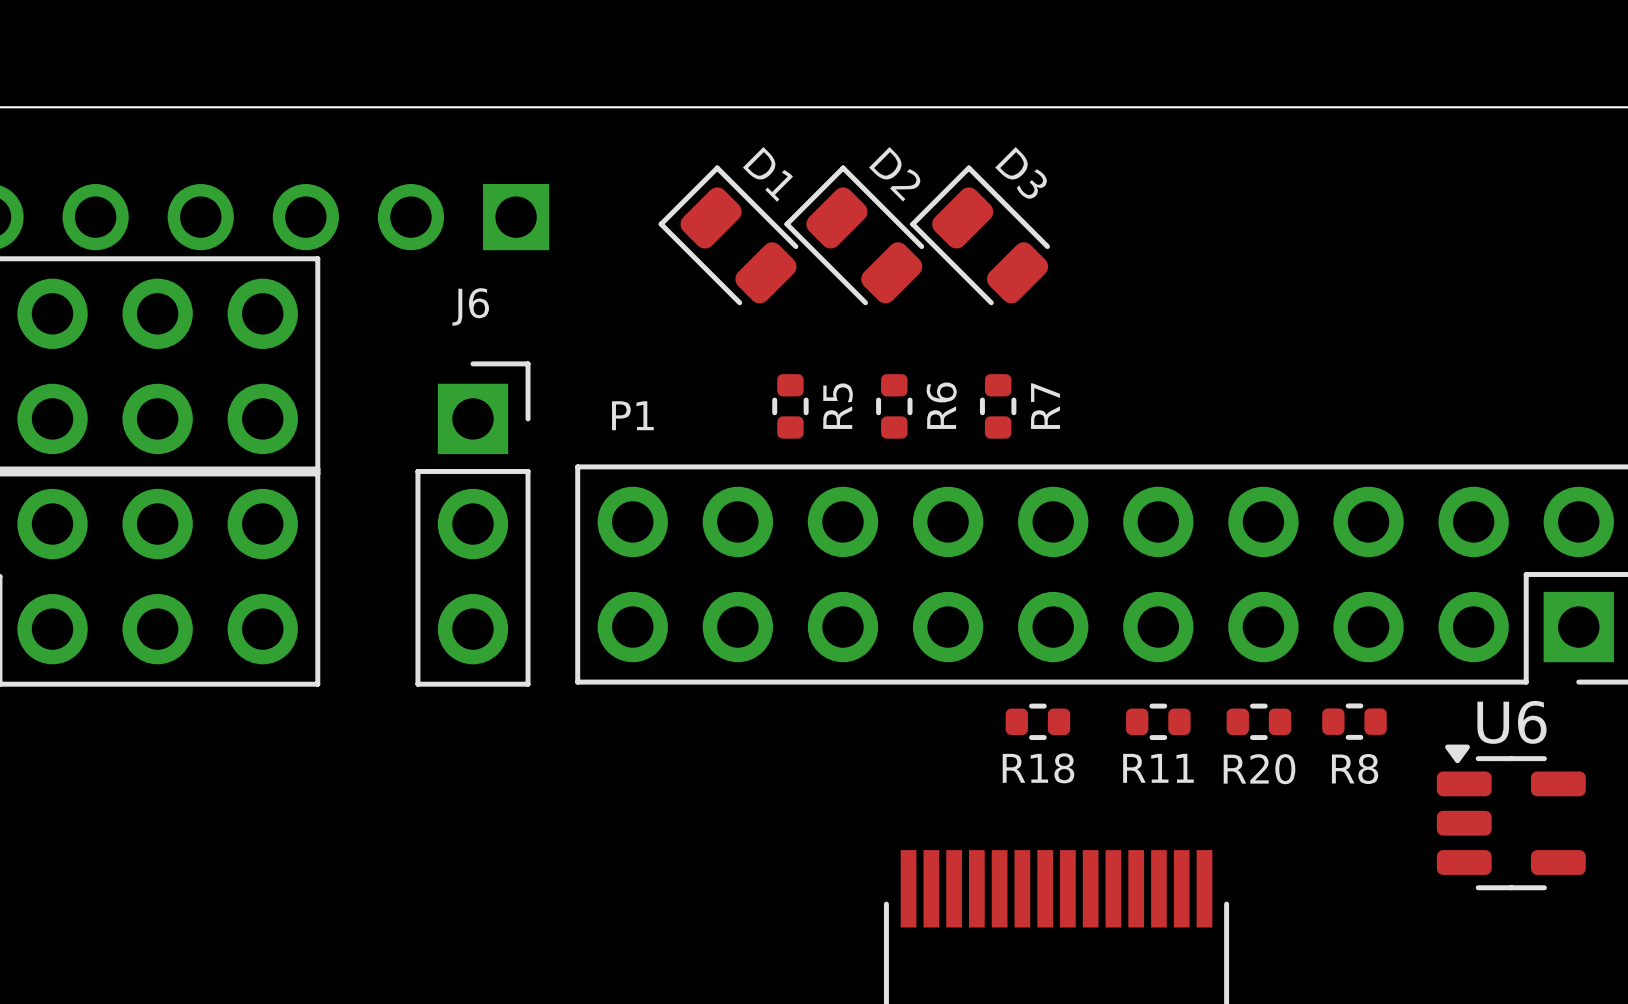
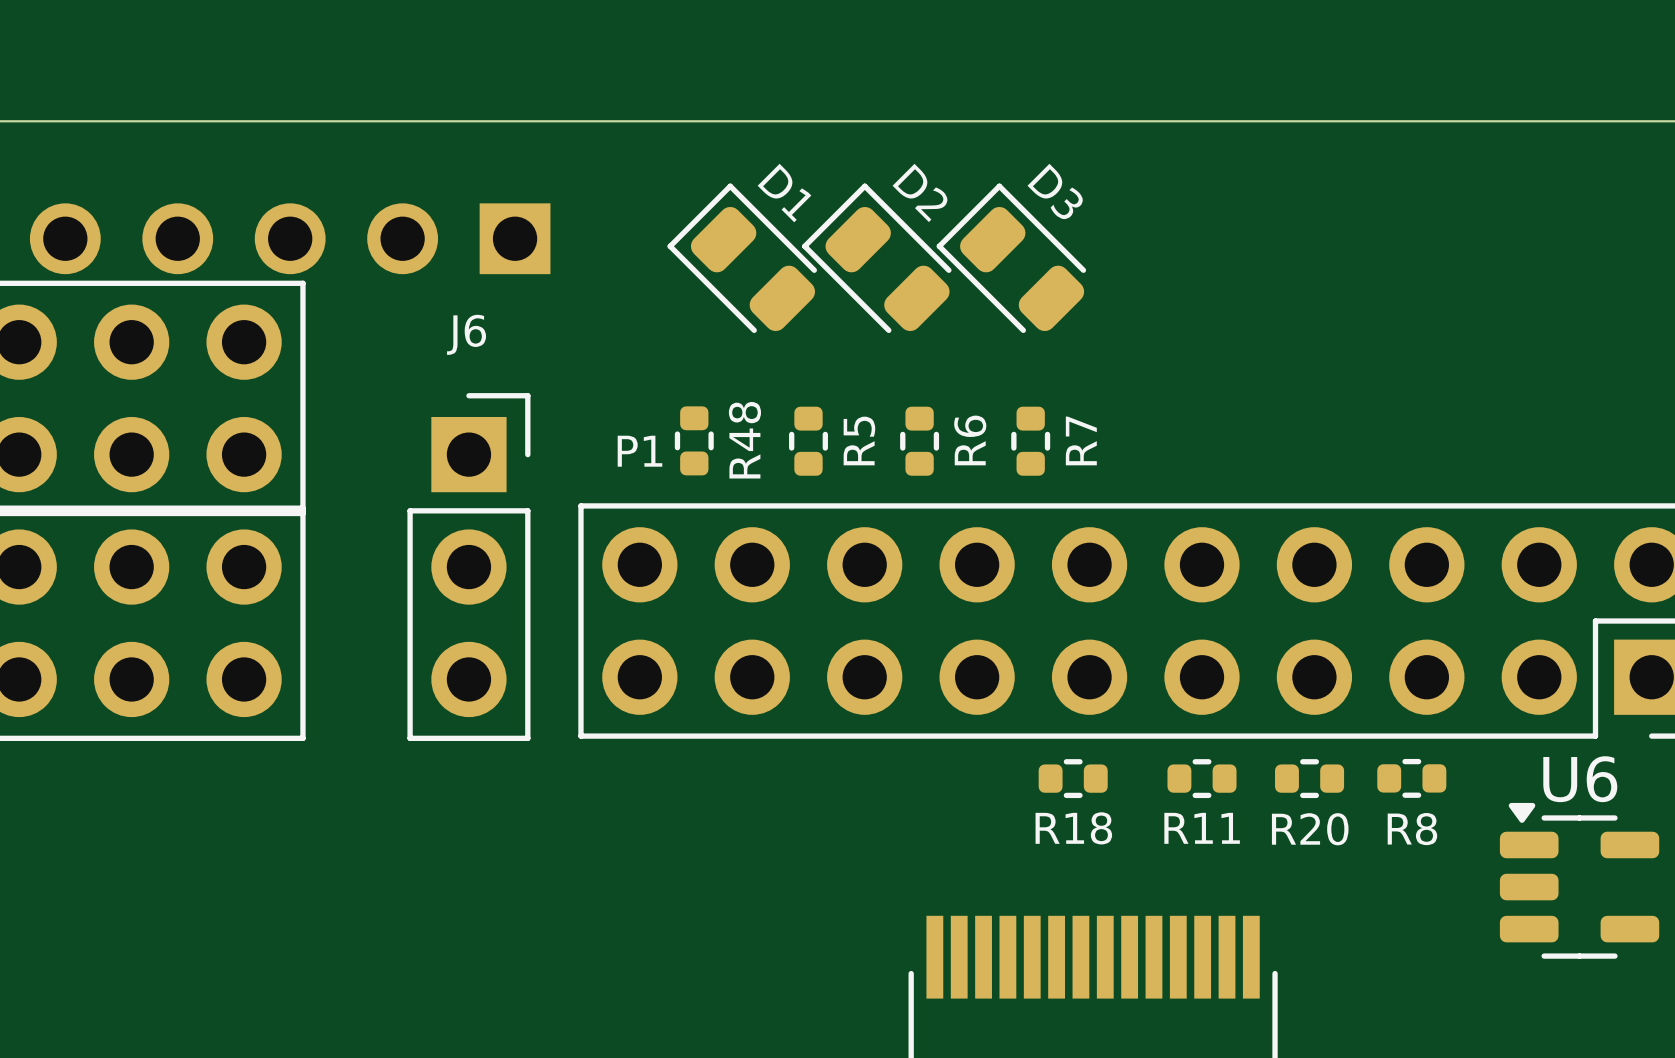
R48: none -> (694, 440)

